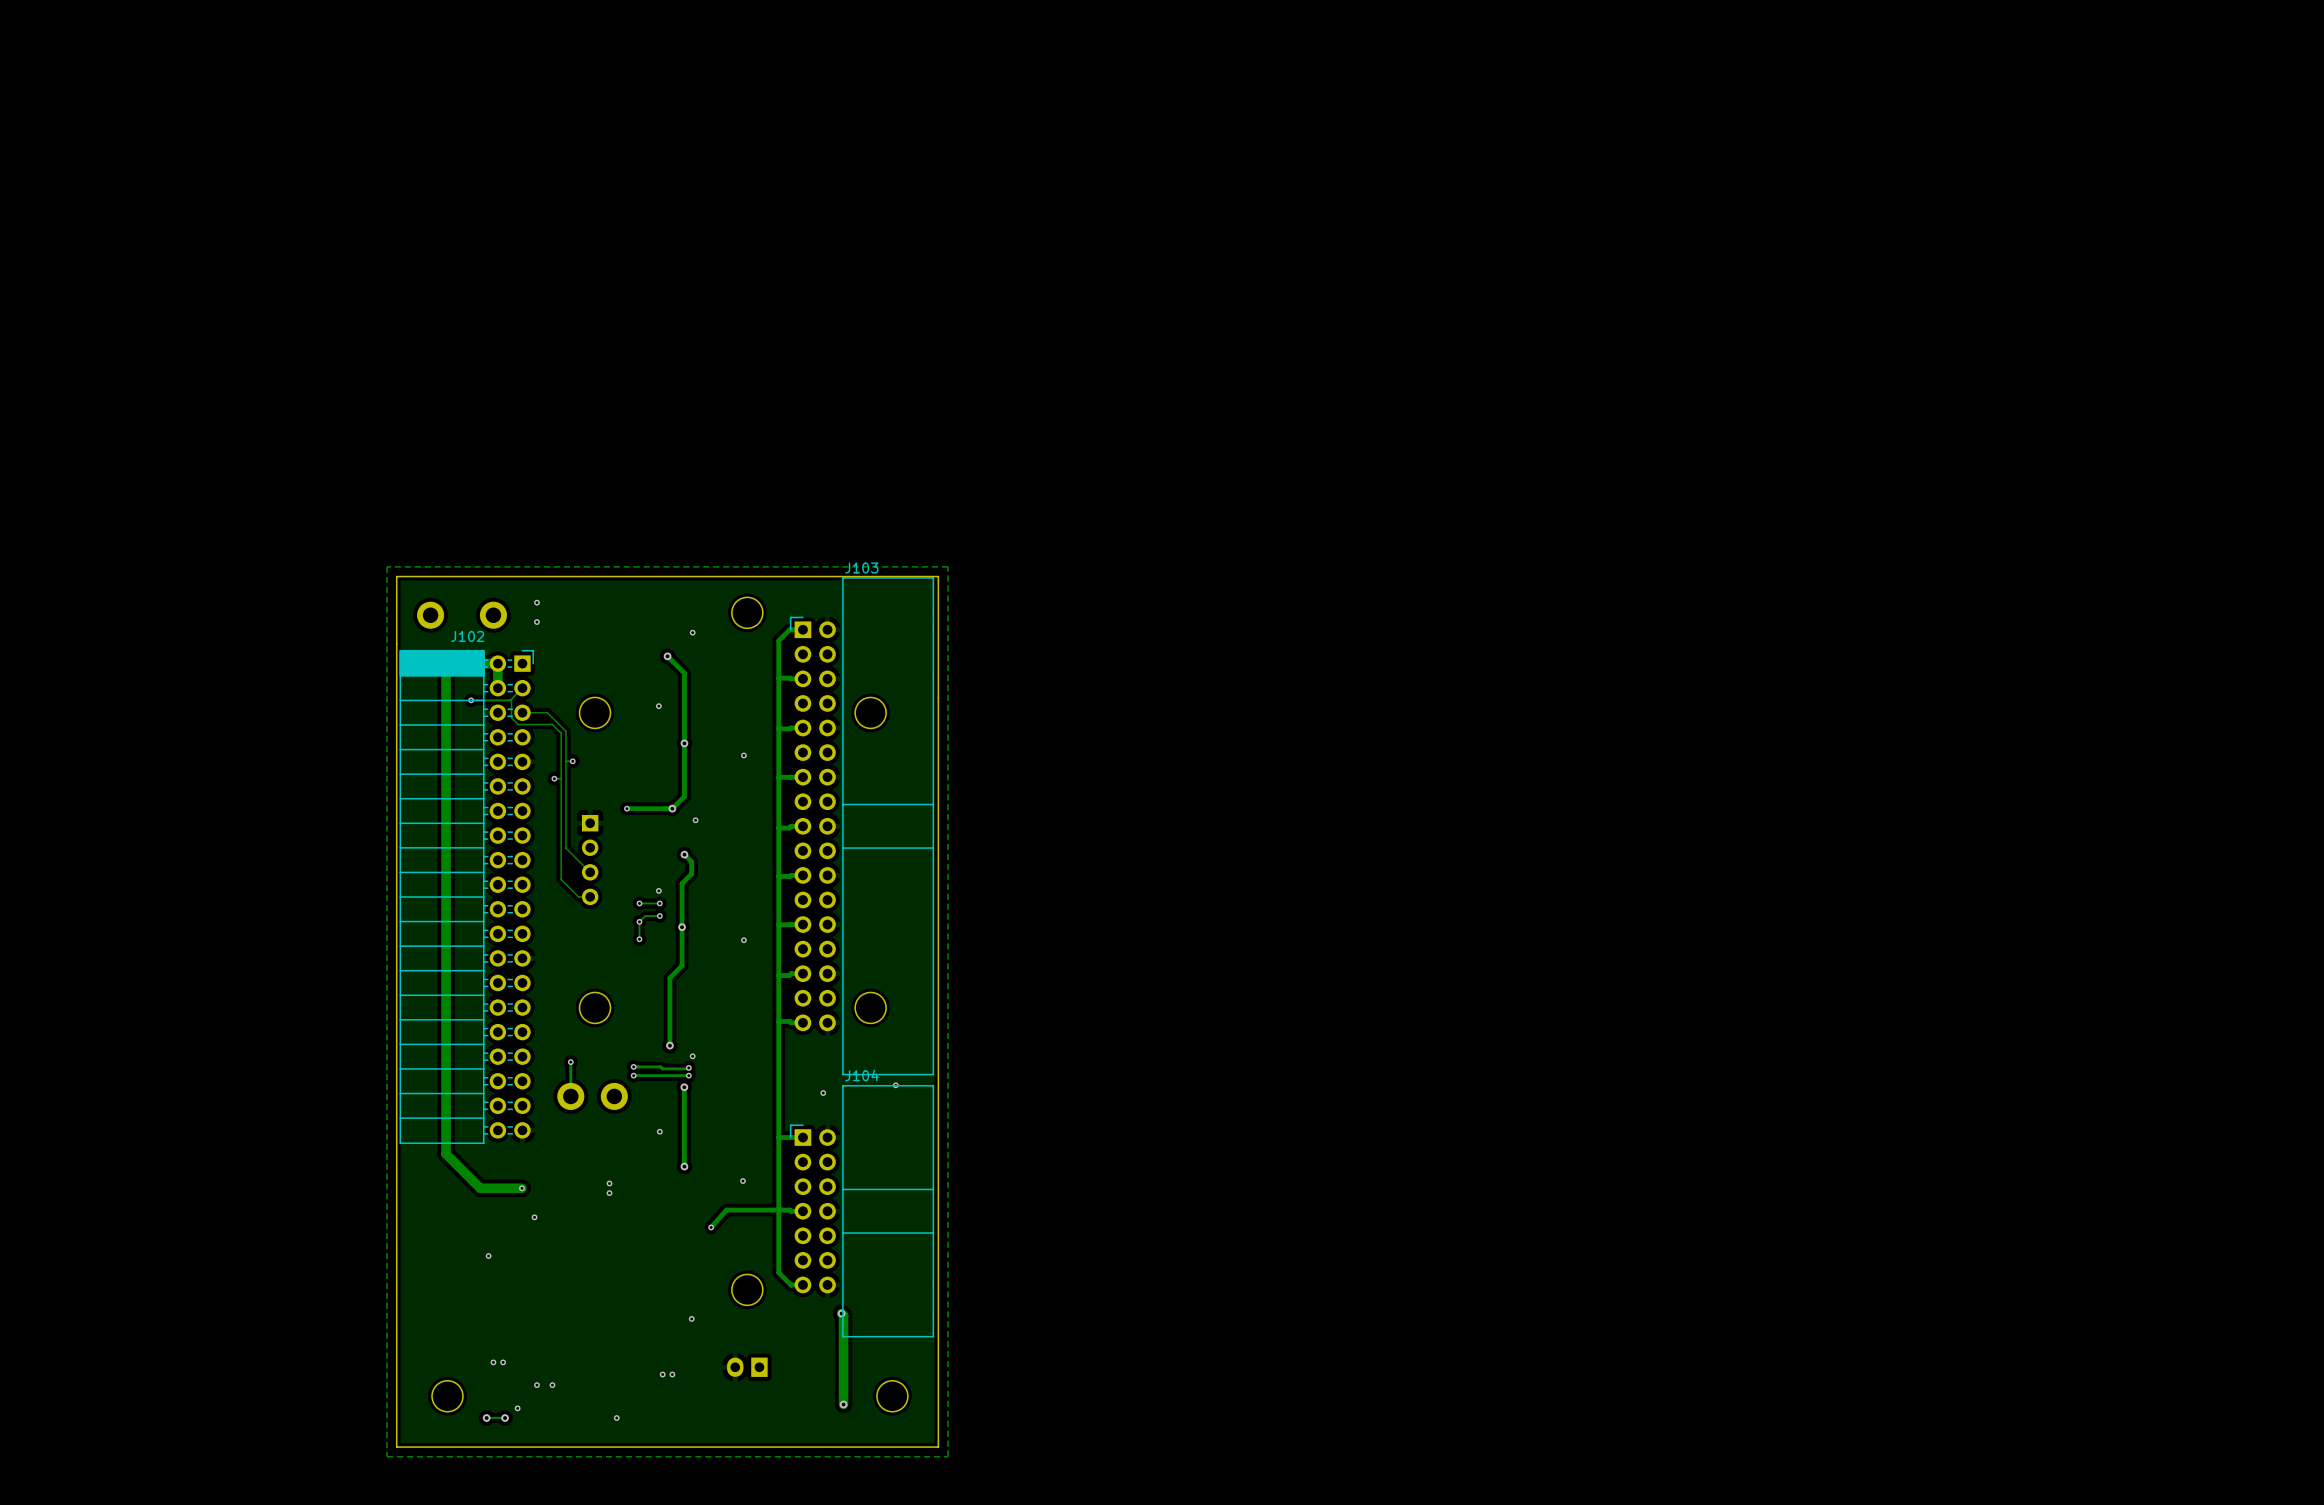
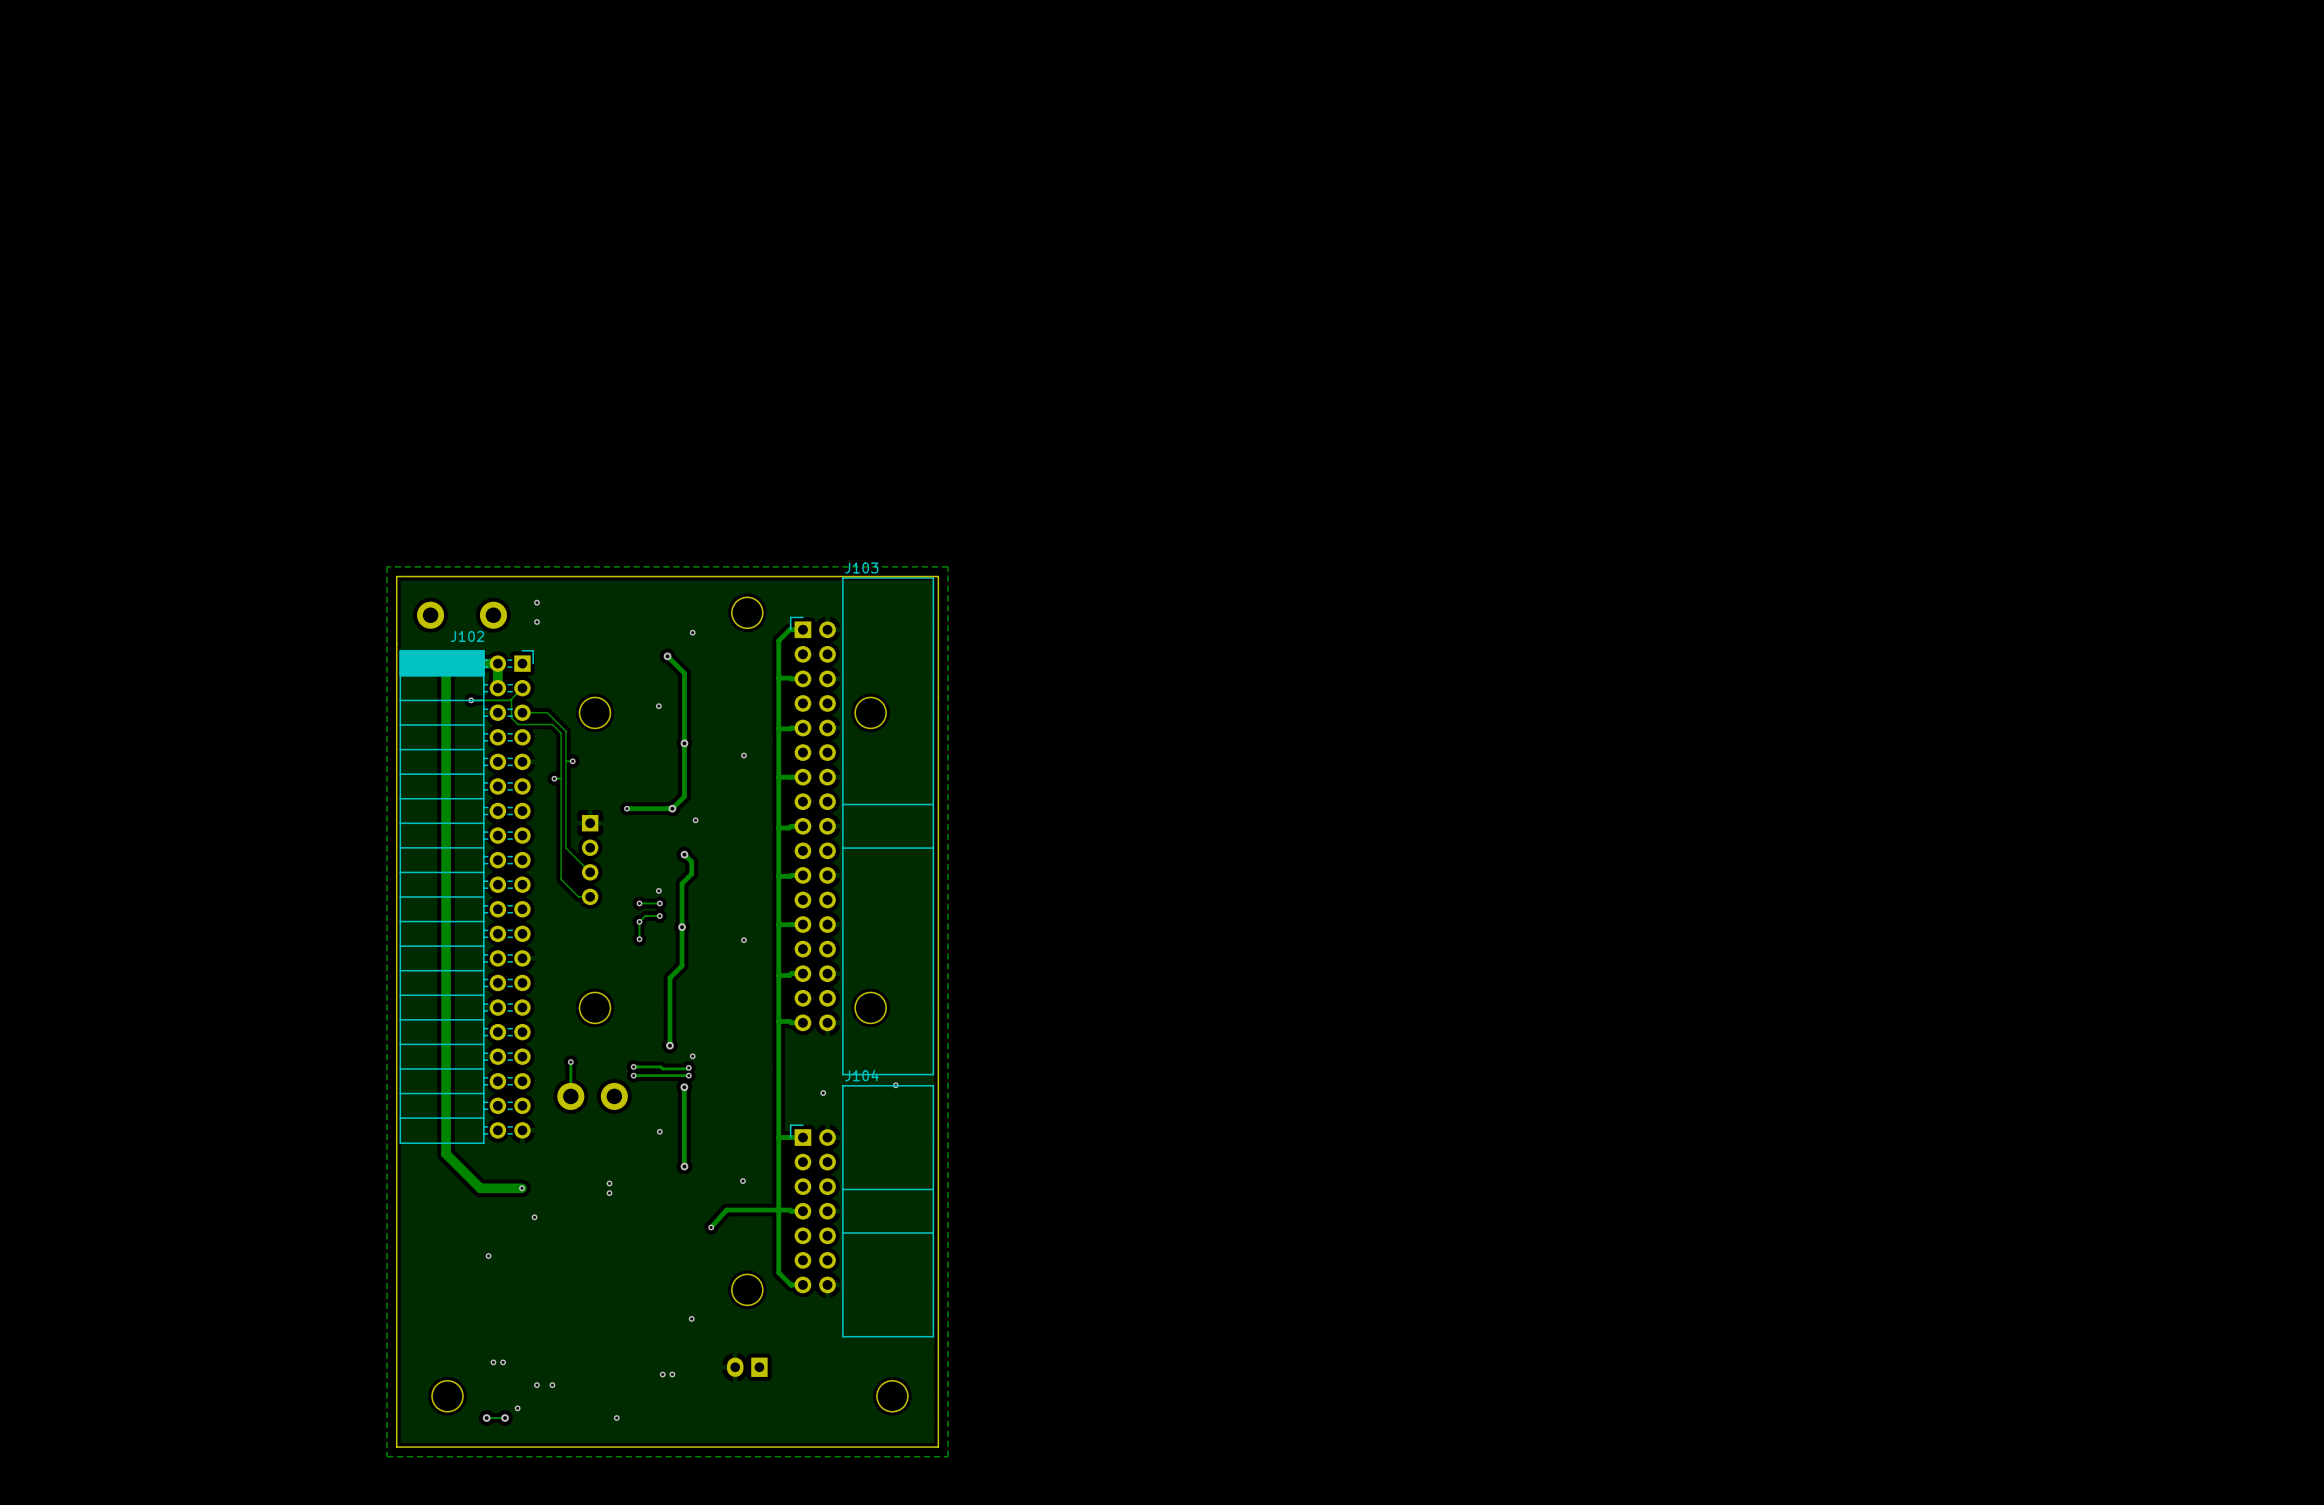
track: (841, 1313) (843, 1315) (843, 1404) -> none
via: (841, 1313) -> none
via: (843, 1404) -> none

